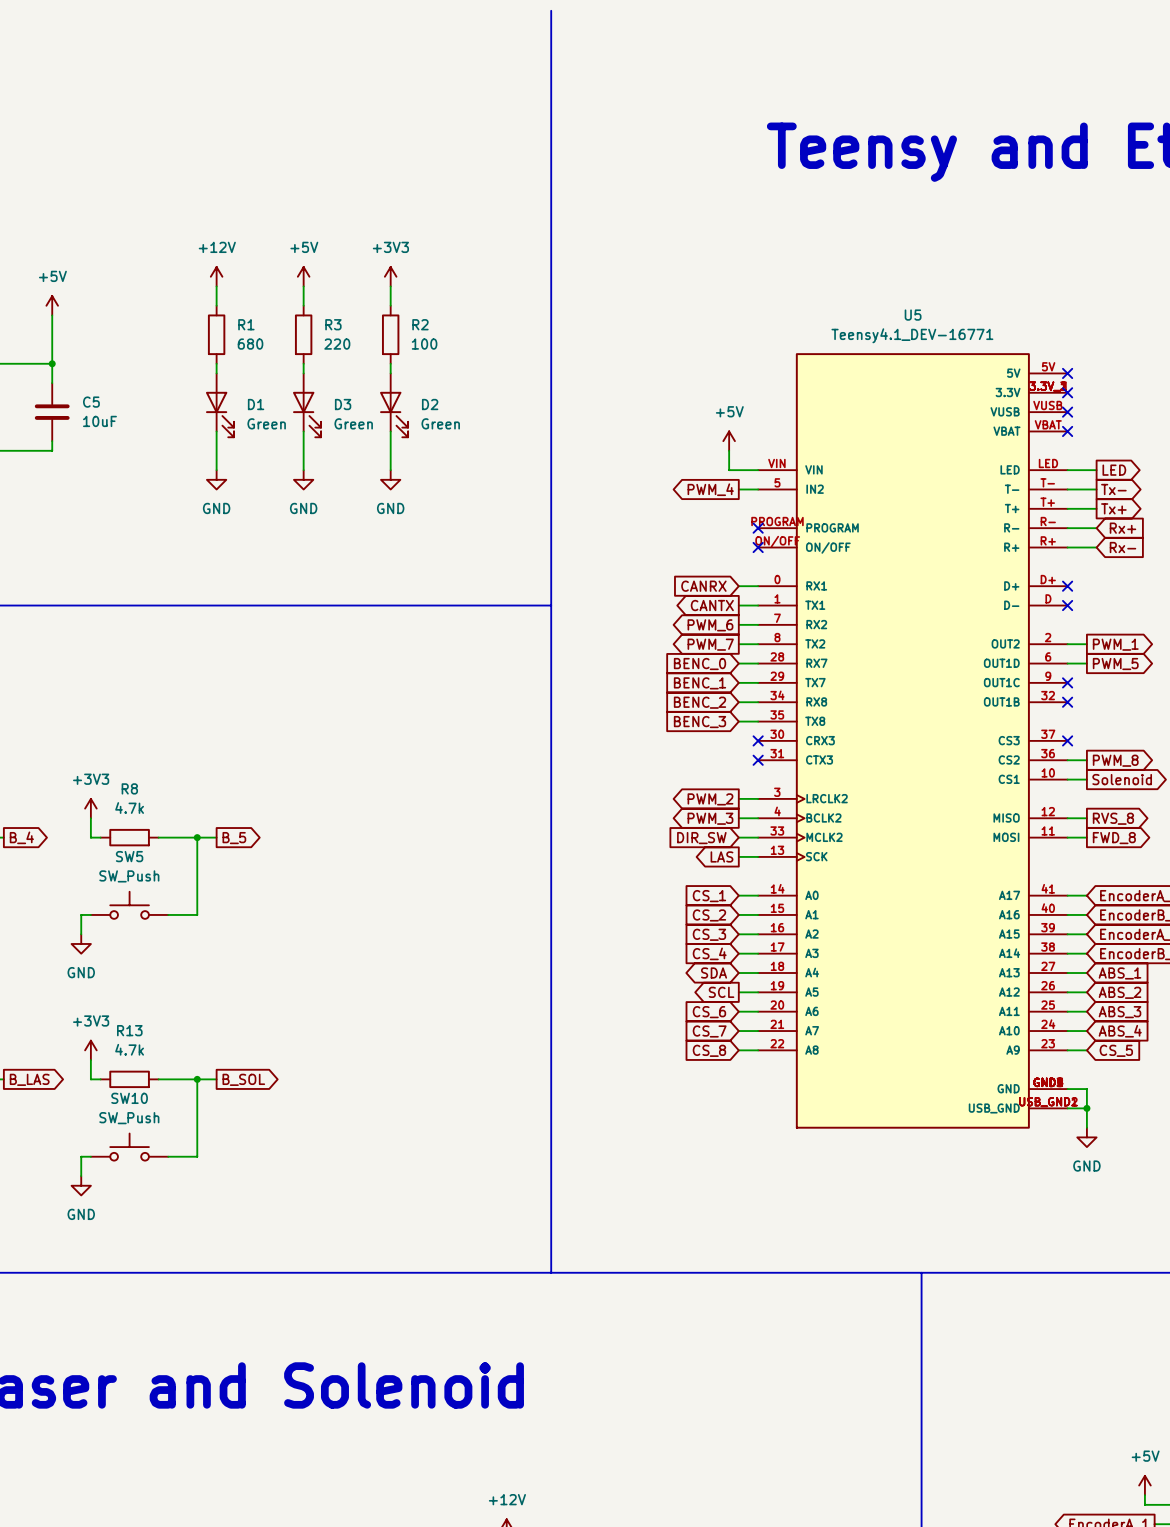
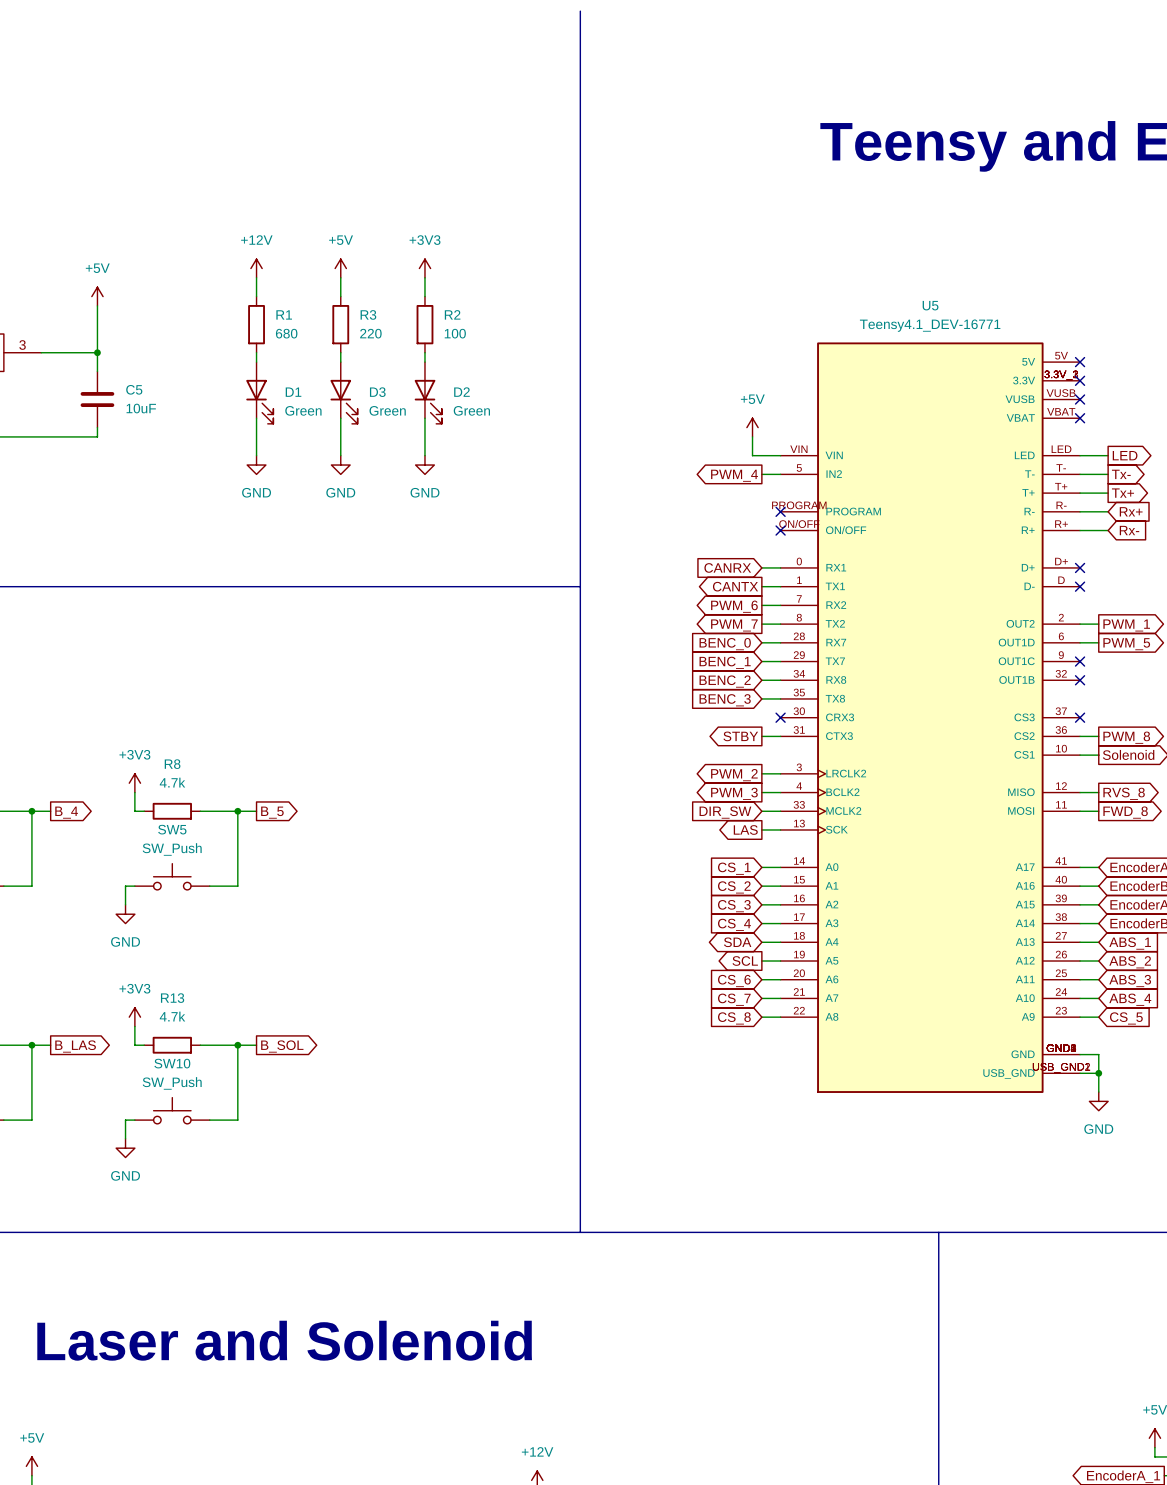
global label: none -> STBY (740, 736)
wire: none -> (761, 736) (780, 736)
no-connect mark: (758, 760) -> none

